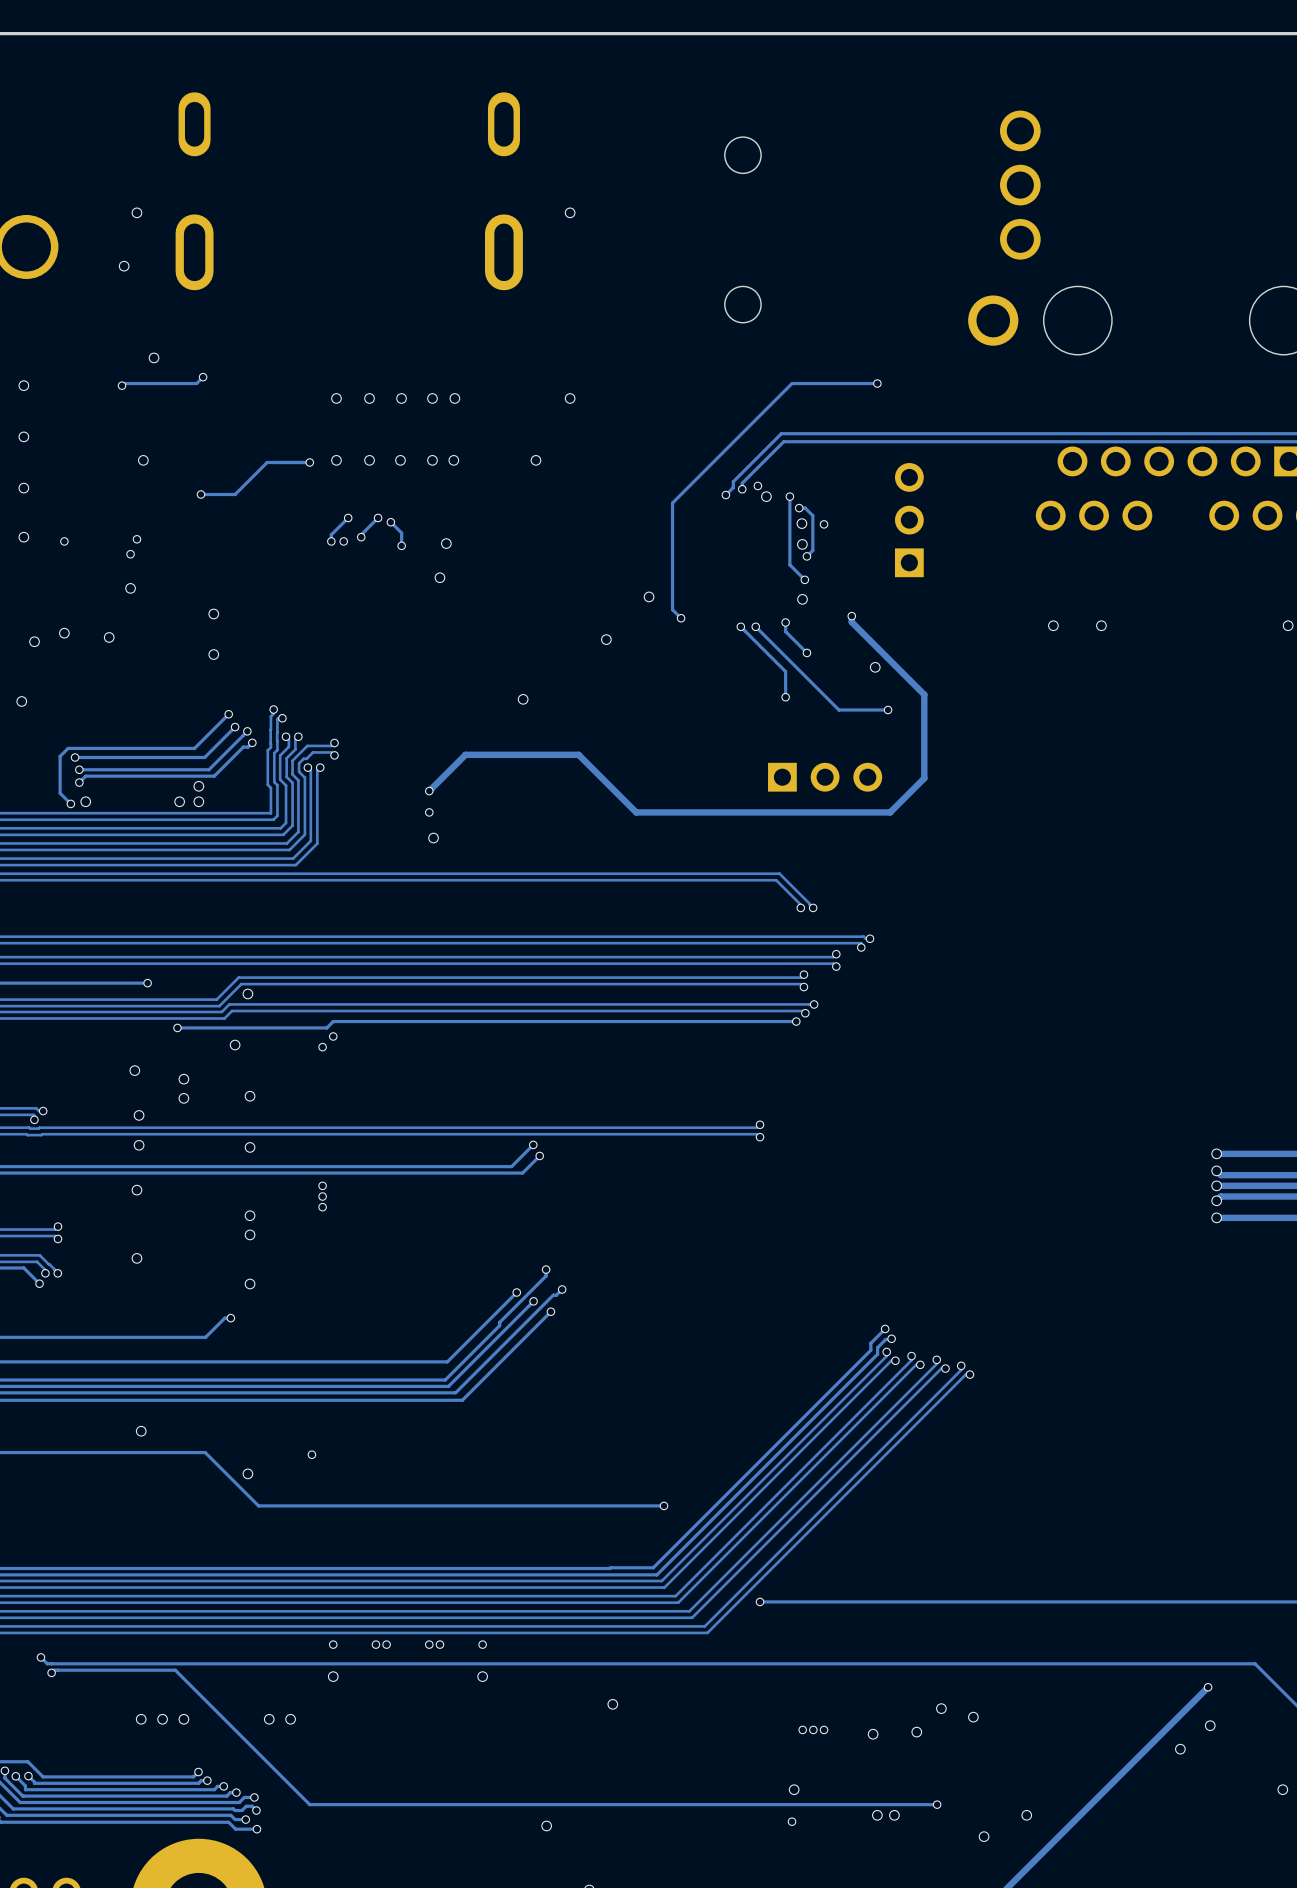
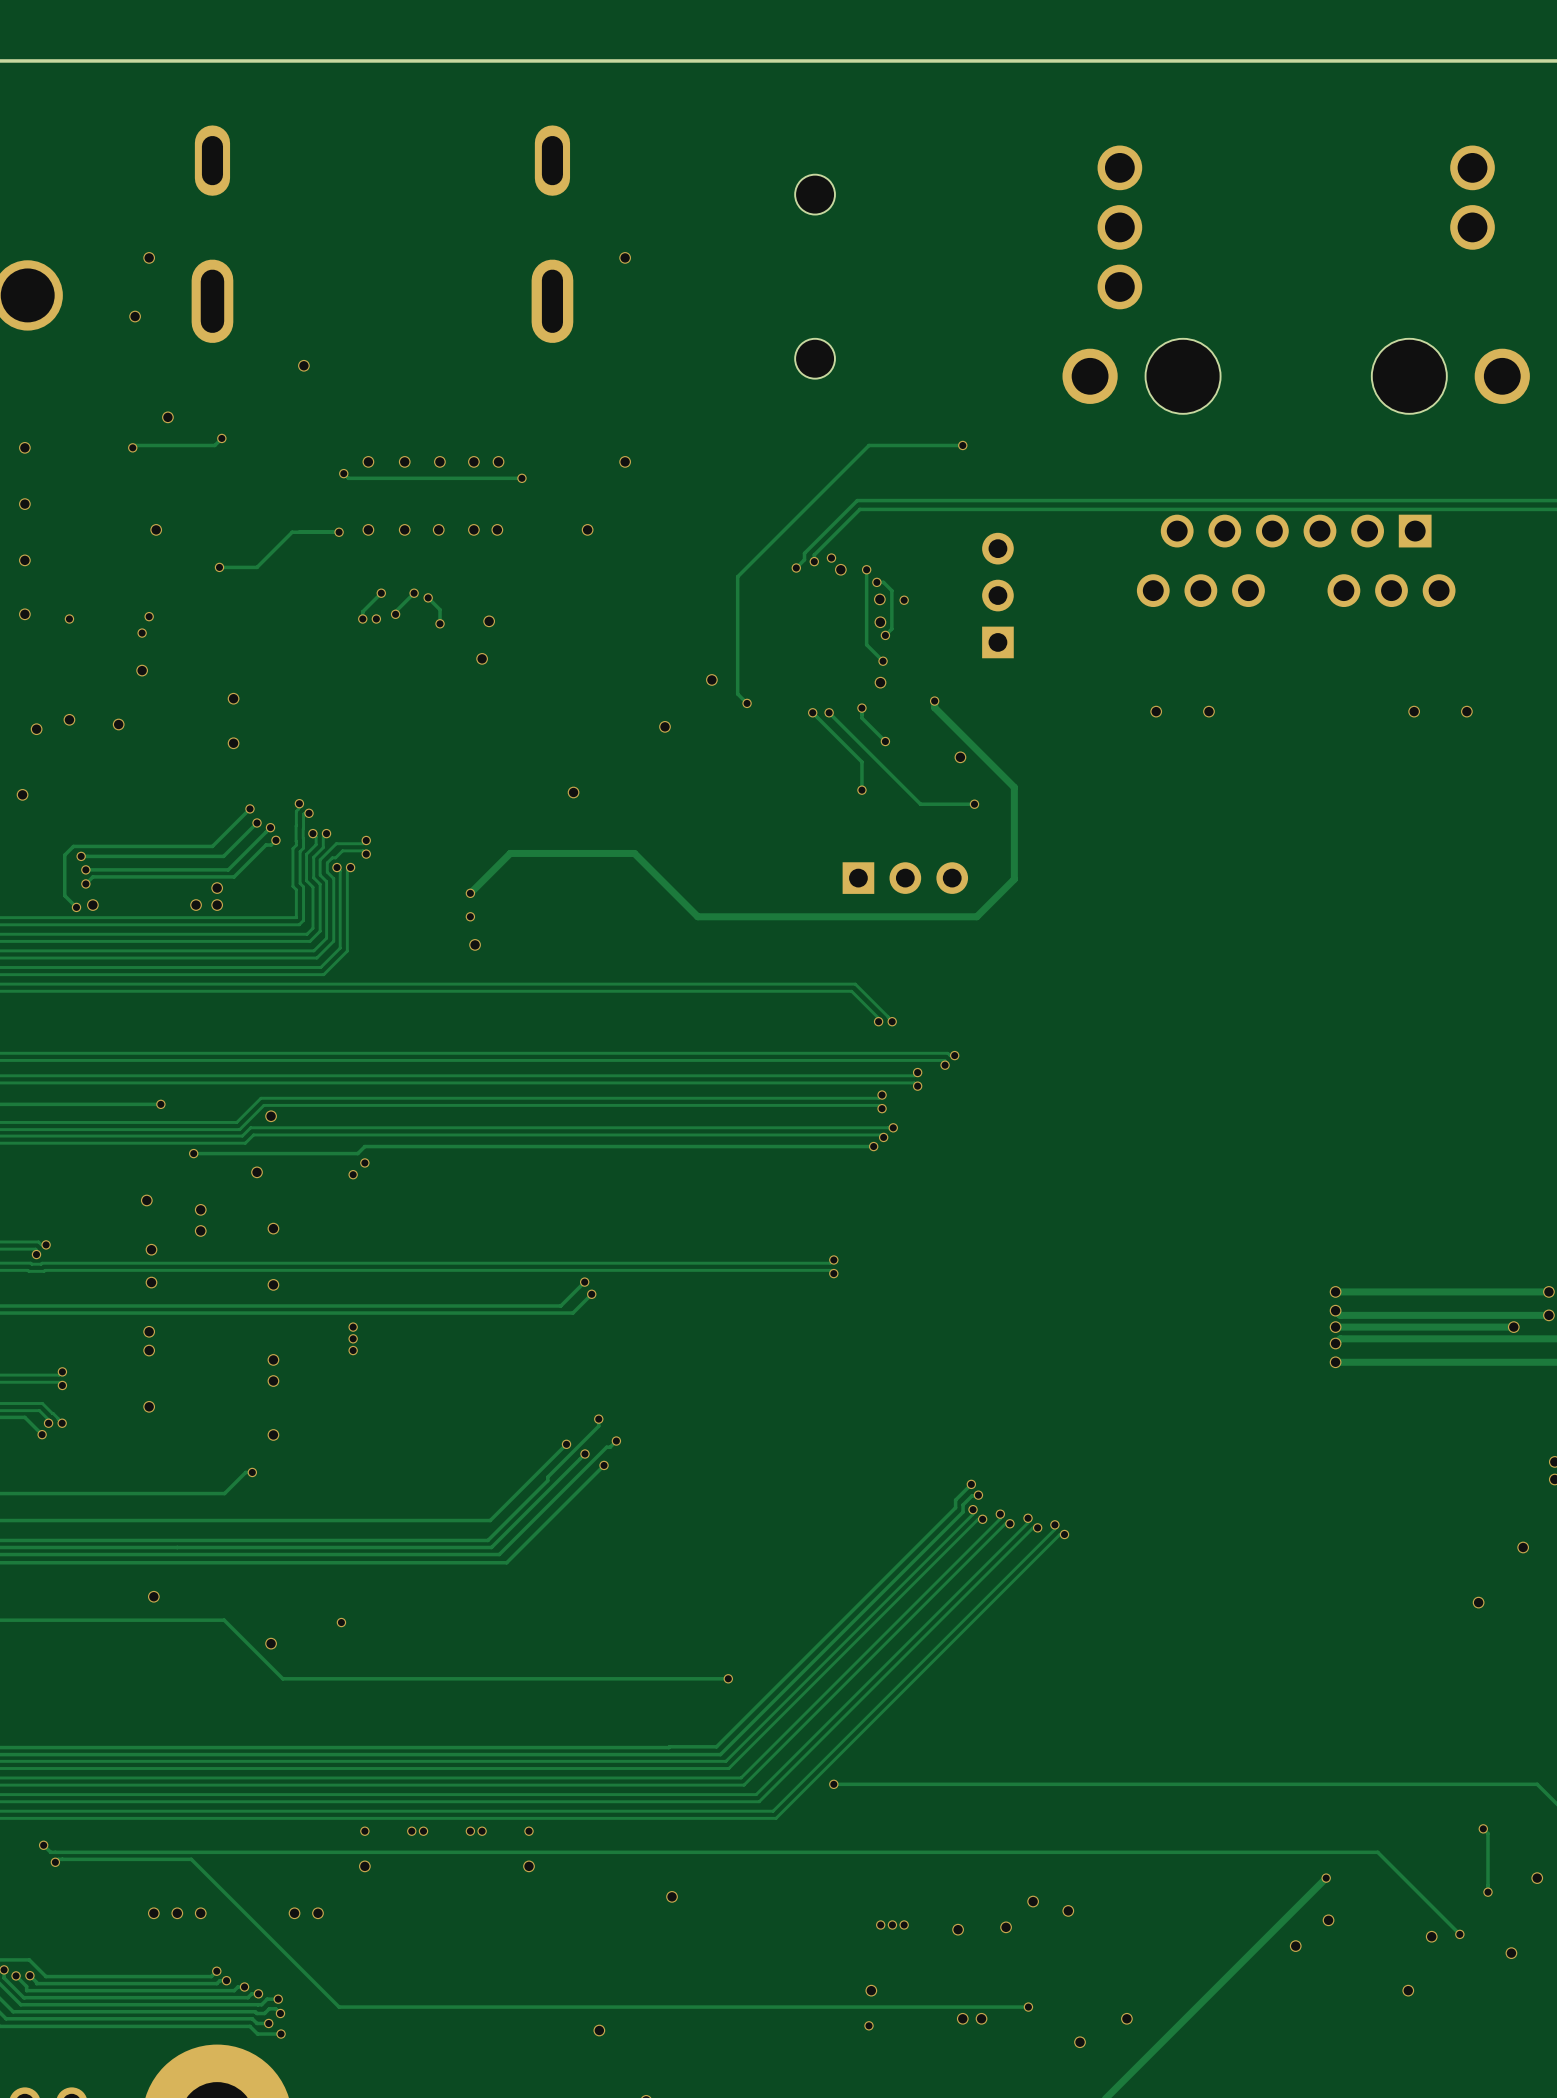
via: none -> (303, 365)
track: none -> (343, 473) (348, 478) (521, 478)
via: none -> (343, 473)
via: none -> (521, 478)
via: none -> (149, 1350)

